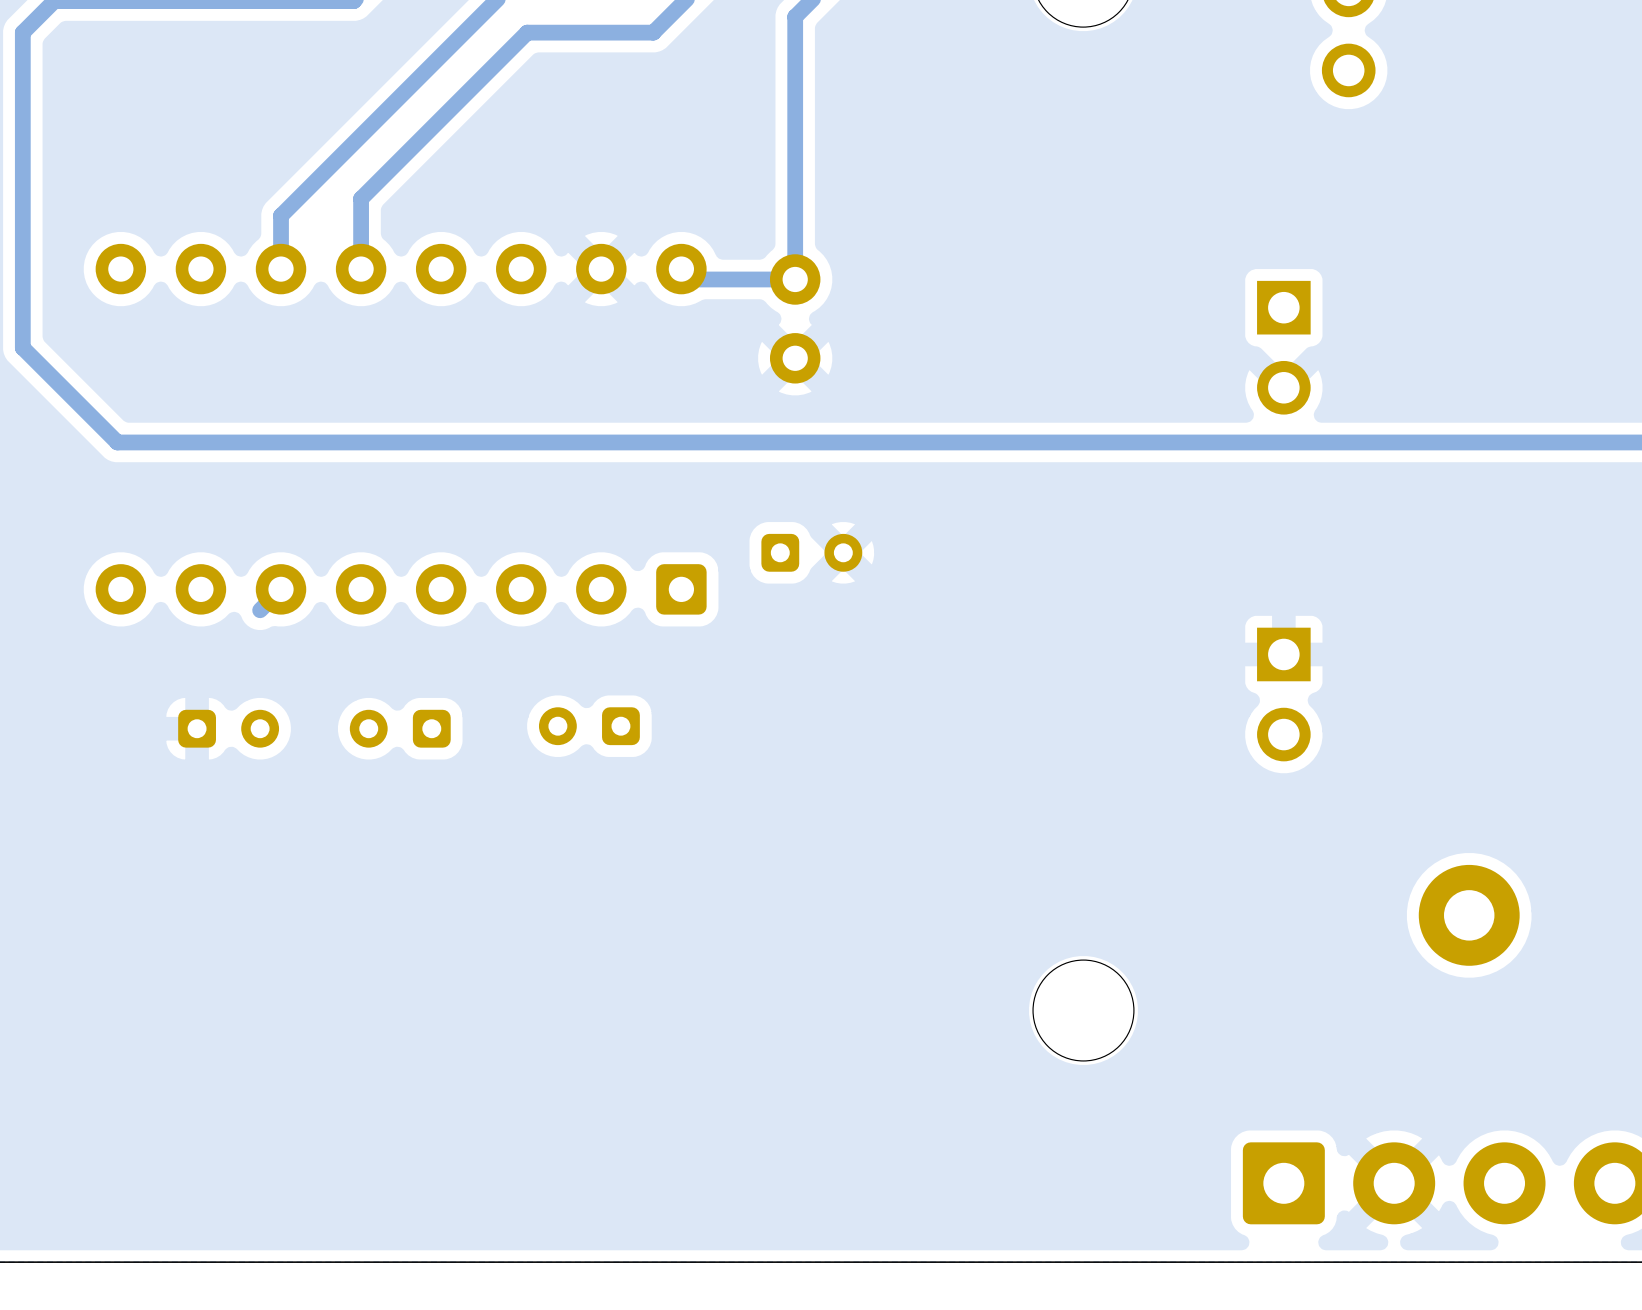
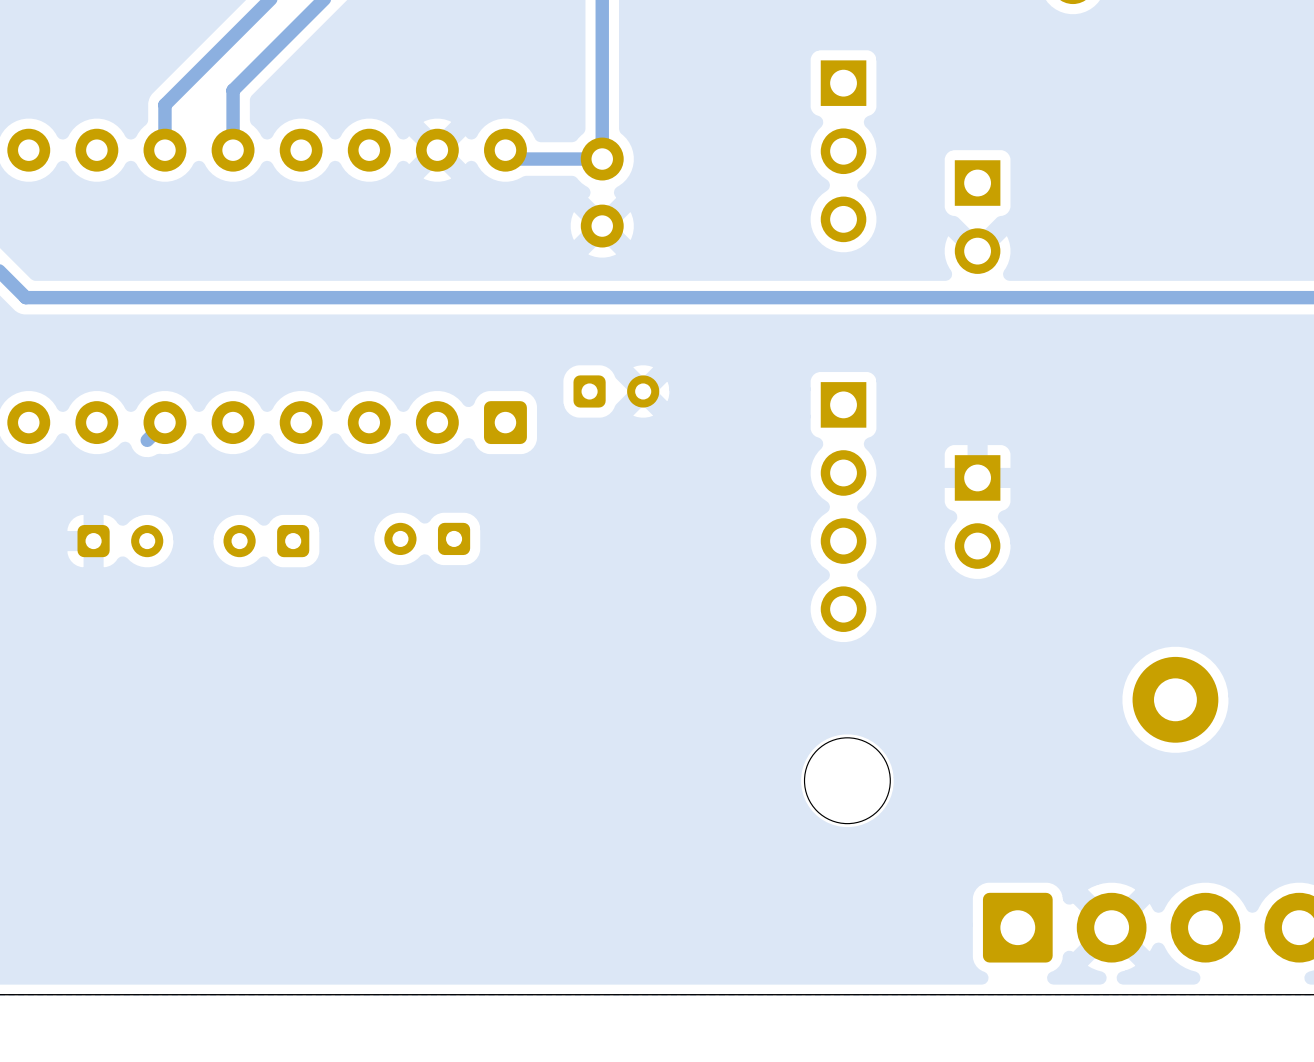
part: none -> (843, 151)
part position: (1283, 347) -> (977, 217)
part: none -> (843, 507)
part position: (1283, 694) -> (977, 511)

